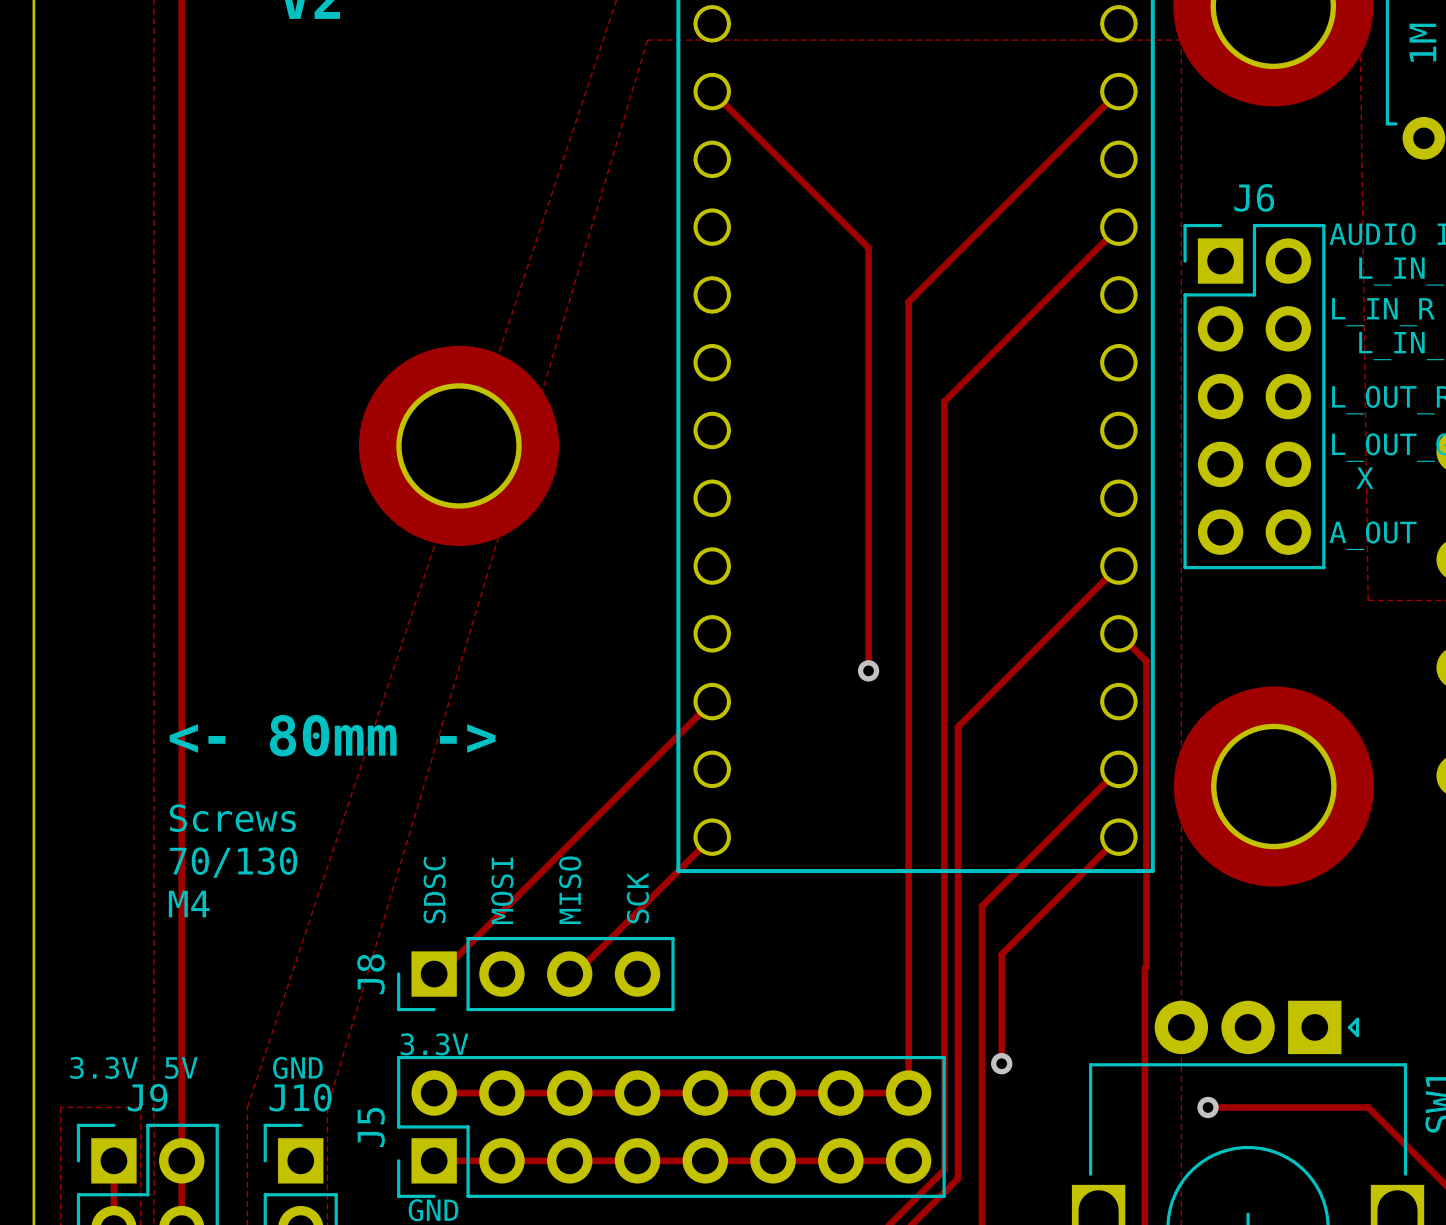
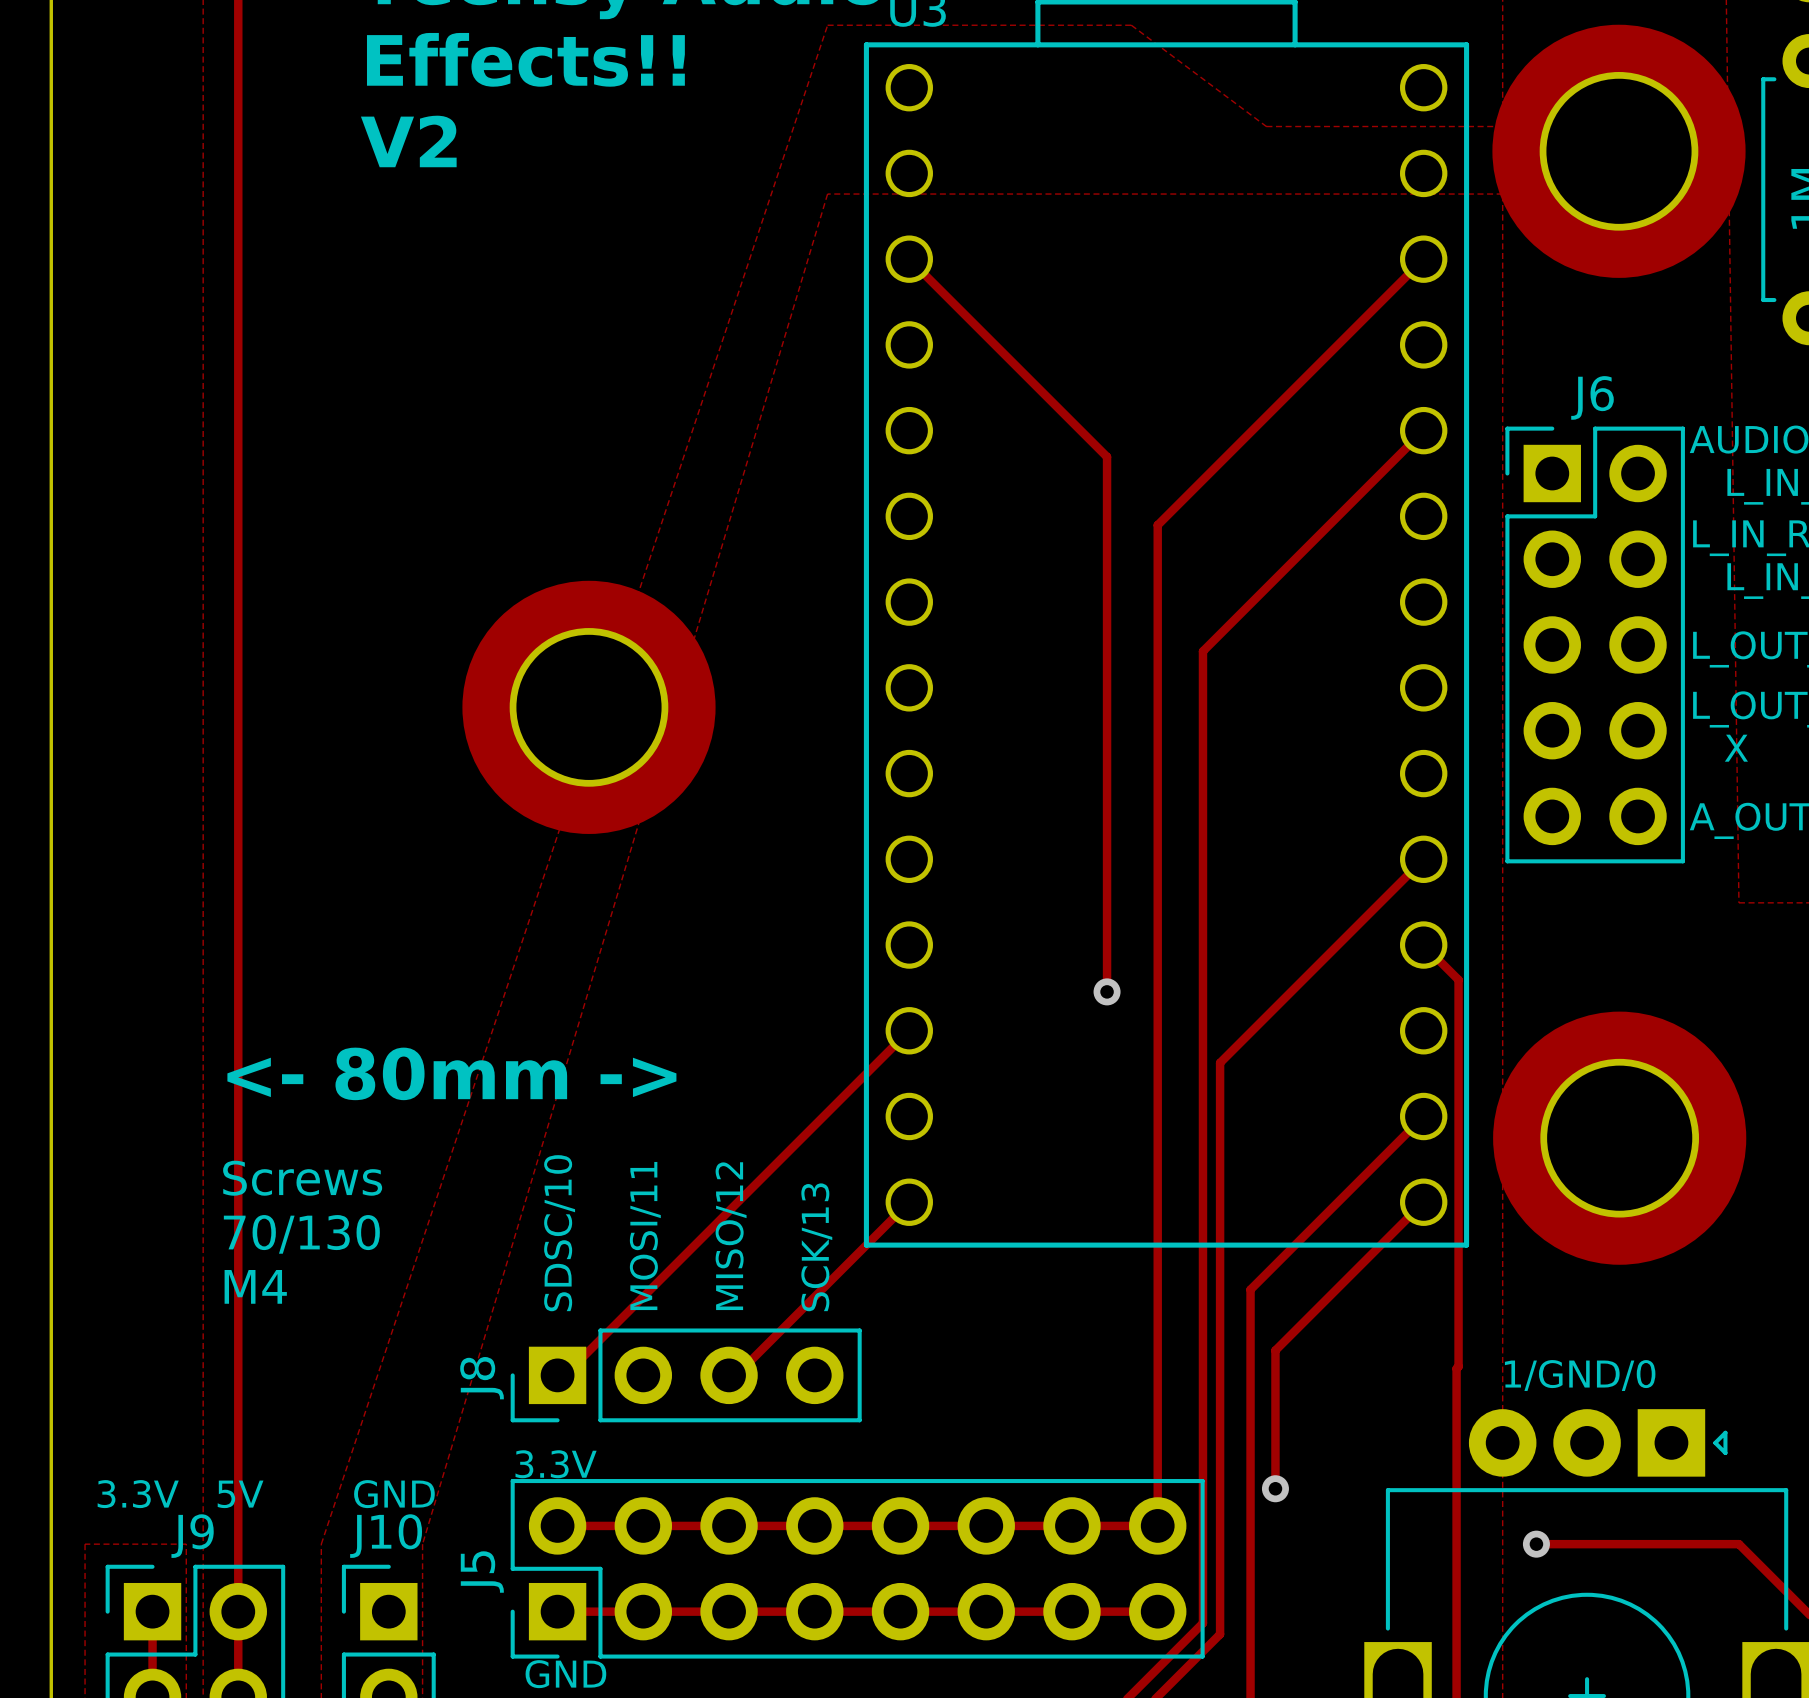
text: SDSC (434, 890) -> SDSC/10 (559, 1233)
text: MOSI (502, 890) -> MOSI/11 (645, 1236)
text: MISO (570, 890) -> MISO/12 (731, 1236)
text: SCK (637, 897) -> SCK/13 (816, 1247)
text: none -> 1/GND/0 (1580, 1375)

